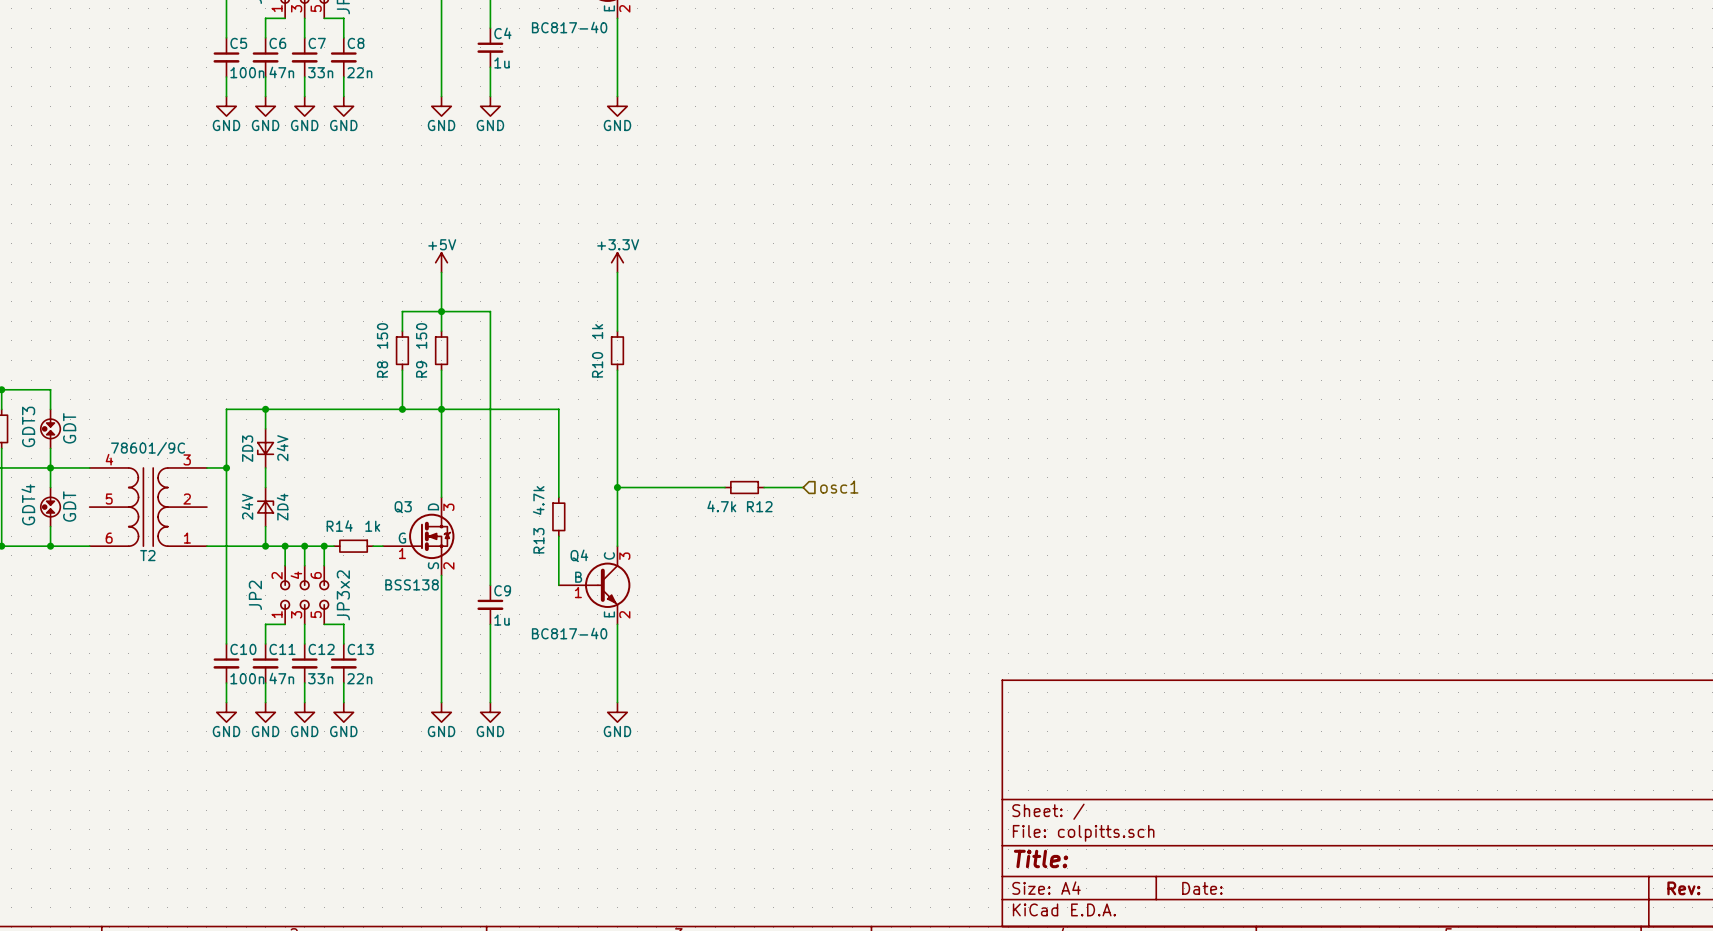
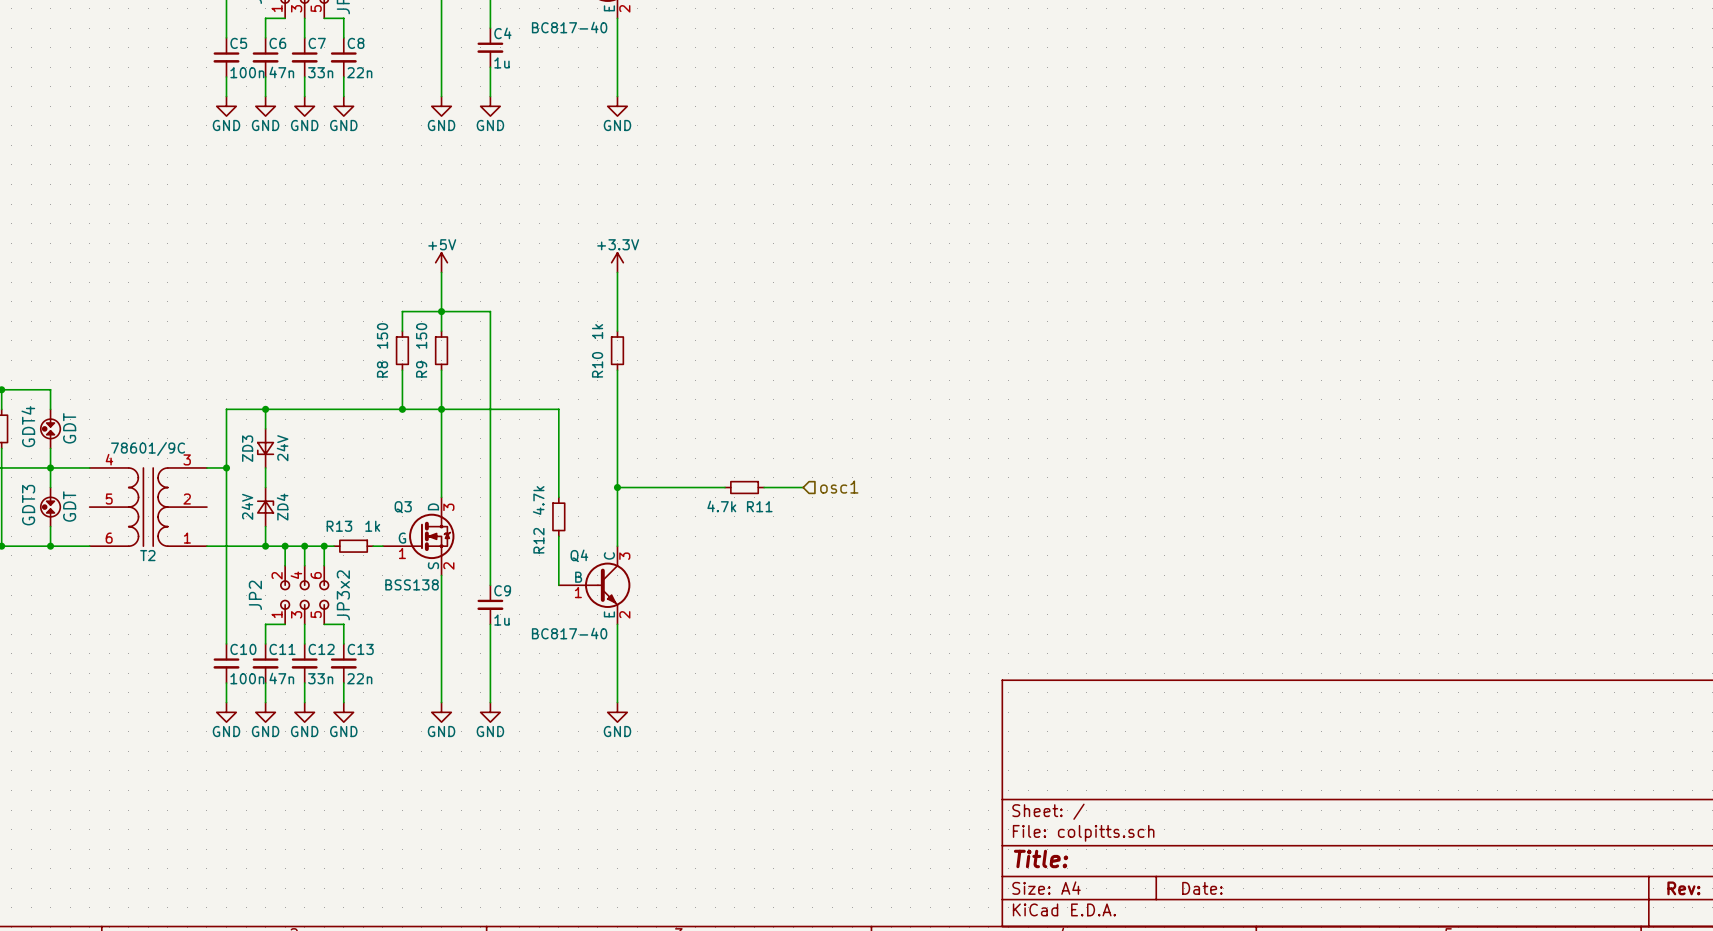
GDT3 name: GDT3 (28, 426) -> GDT4 (28, 426)
GDT4 name: GDT4 (28, 504) -> GDT3 (28, 505)
R12 name: R12 (759, 506) -> R11 (759, 506)
R14 name: R14 (339, 526) -> R13 (339, 526)
R13 name: R13 (538, 540) -> R12 (538, 540)

